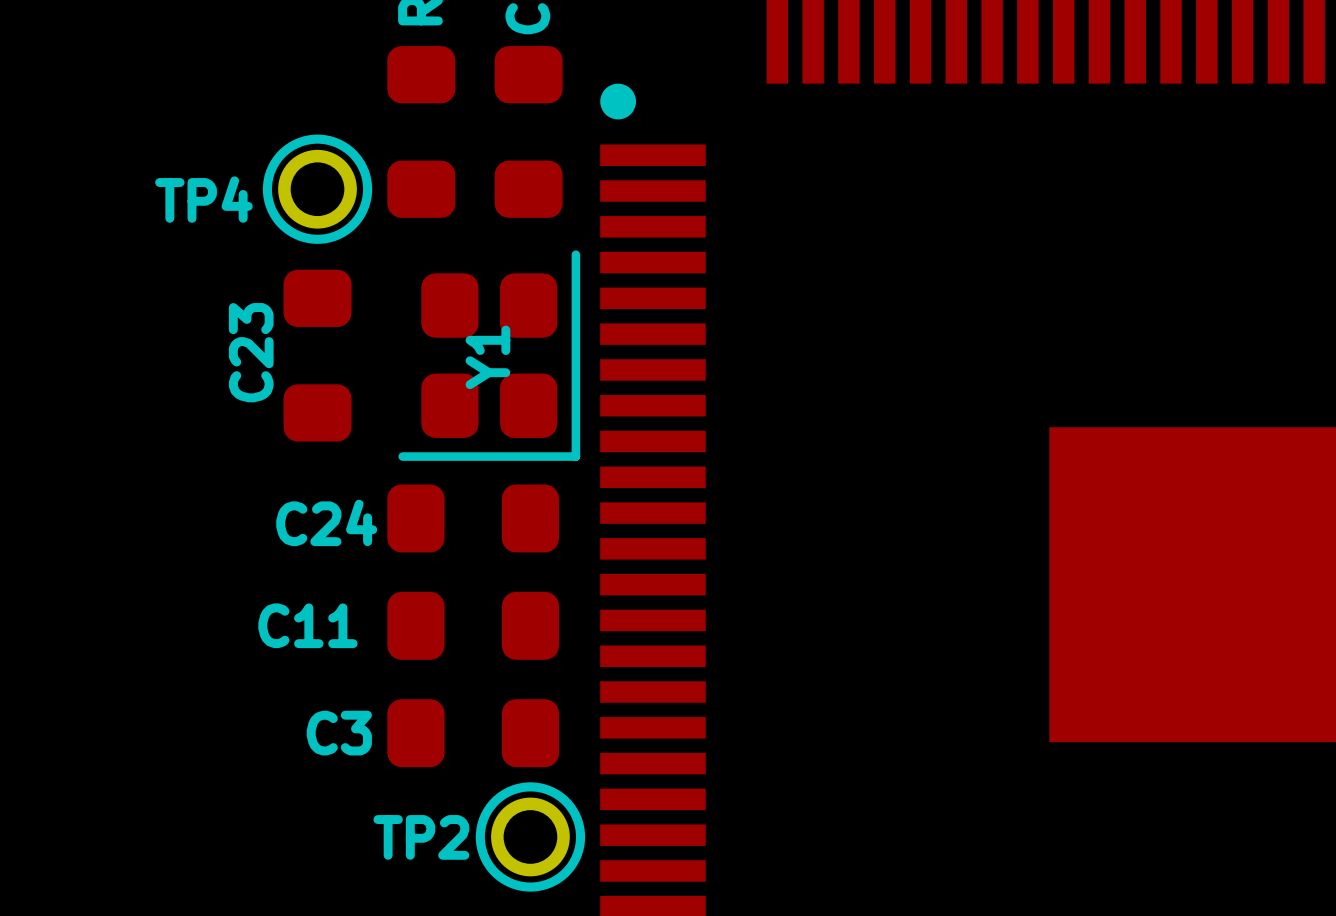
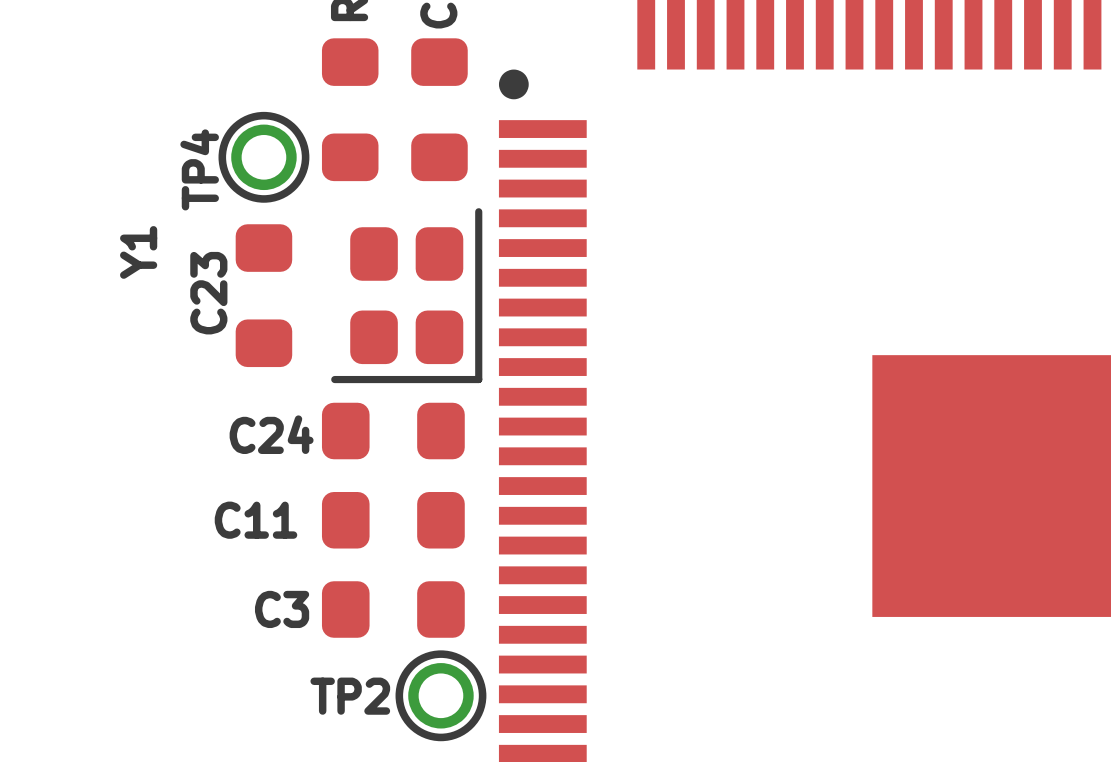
TP4 name rotation: 0° (203, 199) -> 90° counterclockwise (199, 169)
Y1 name position: Y1 (487, 357) -> Y1 (138, 252)

